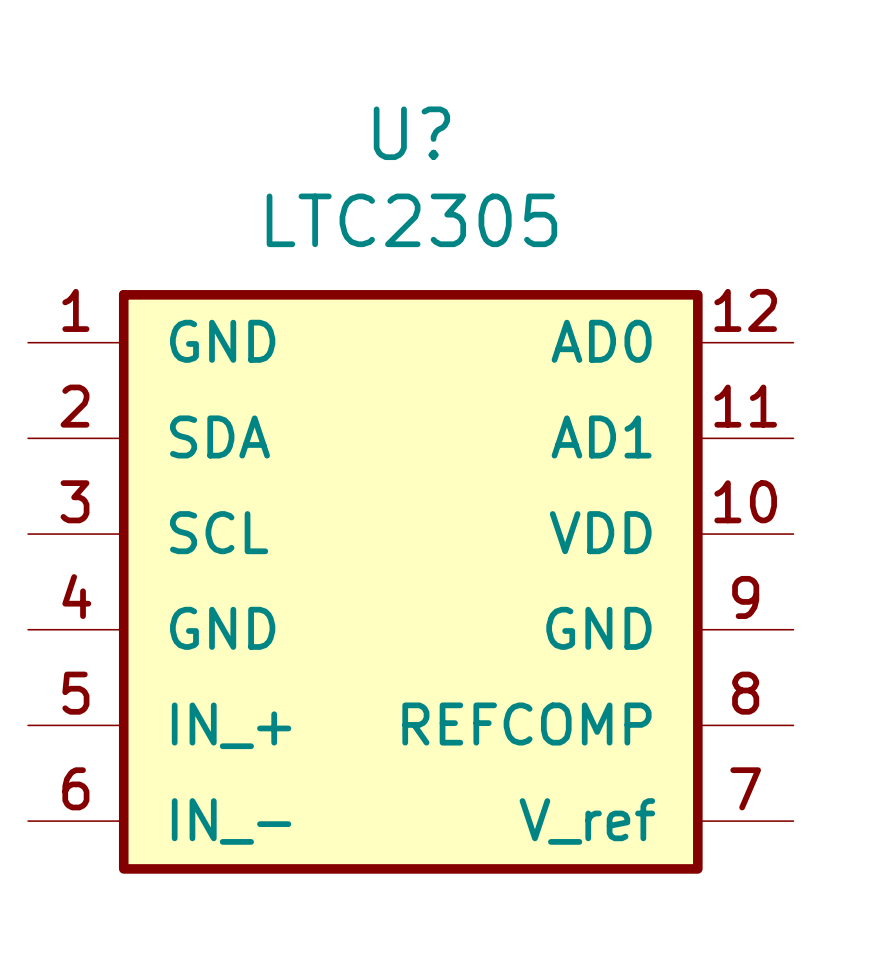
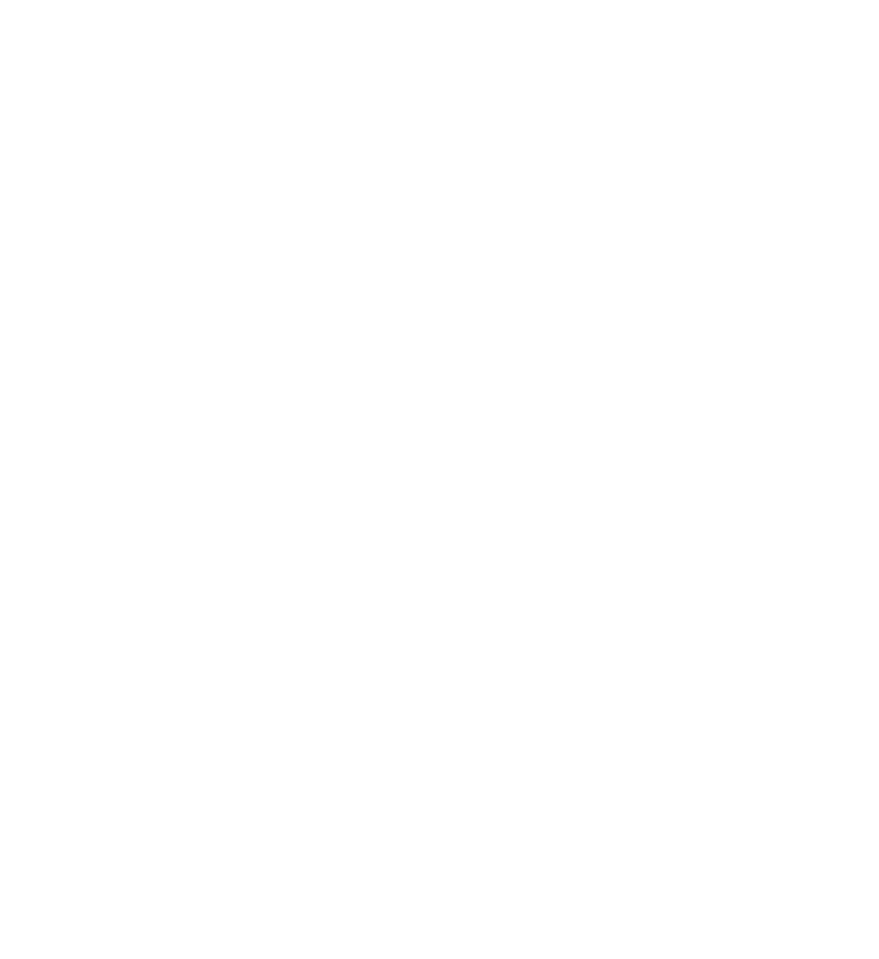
U?: LTC2305 (410, 581) -> none

